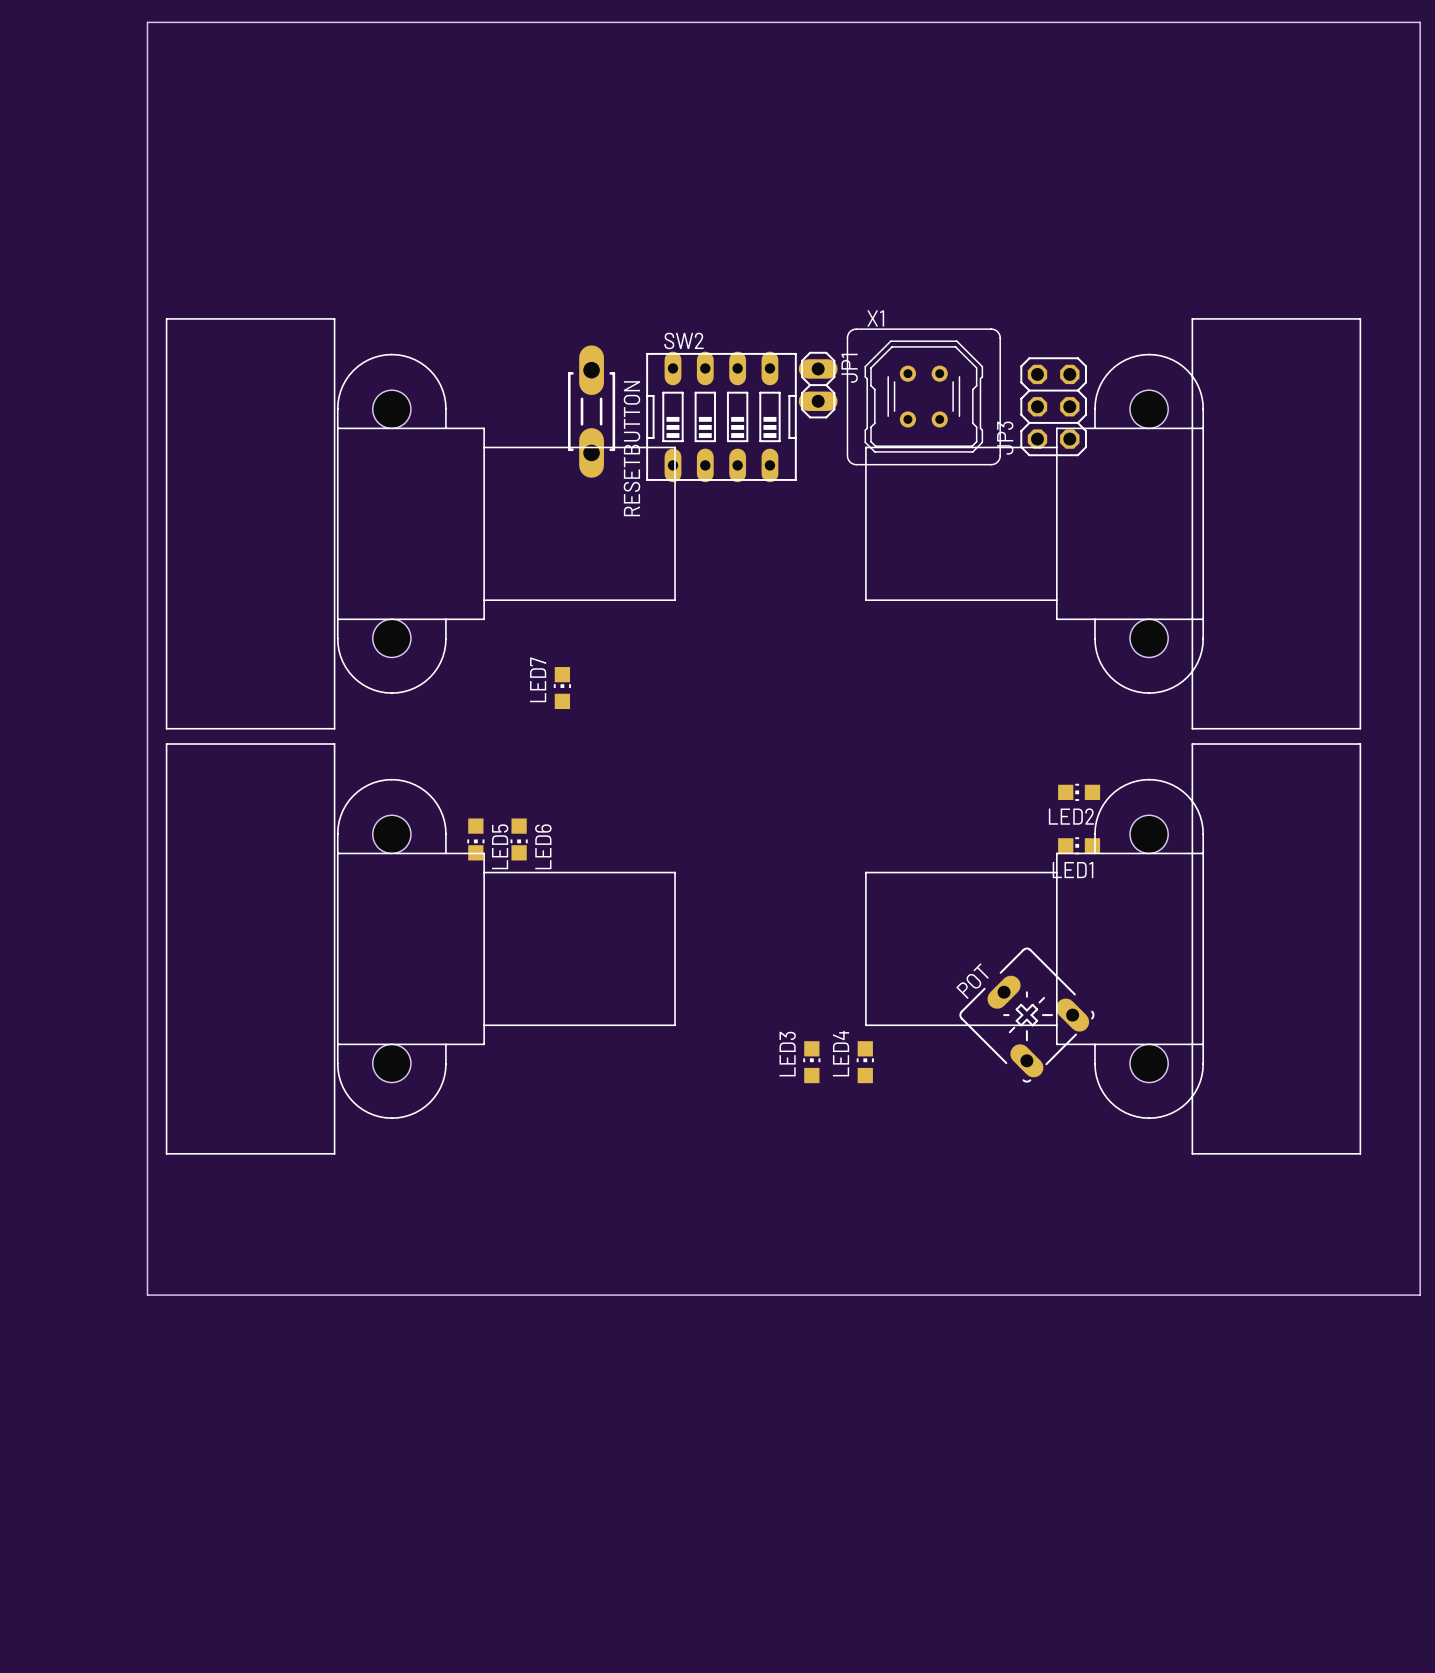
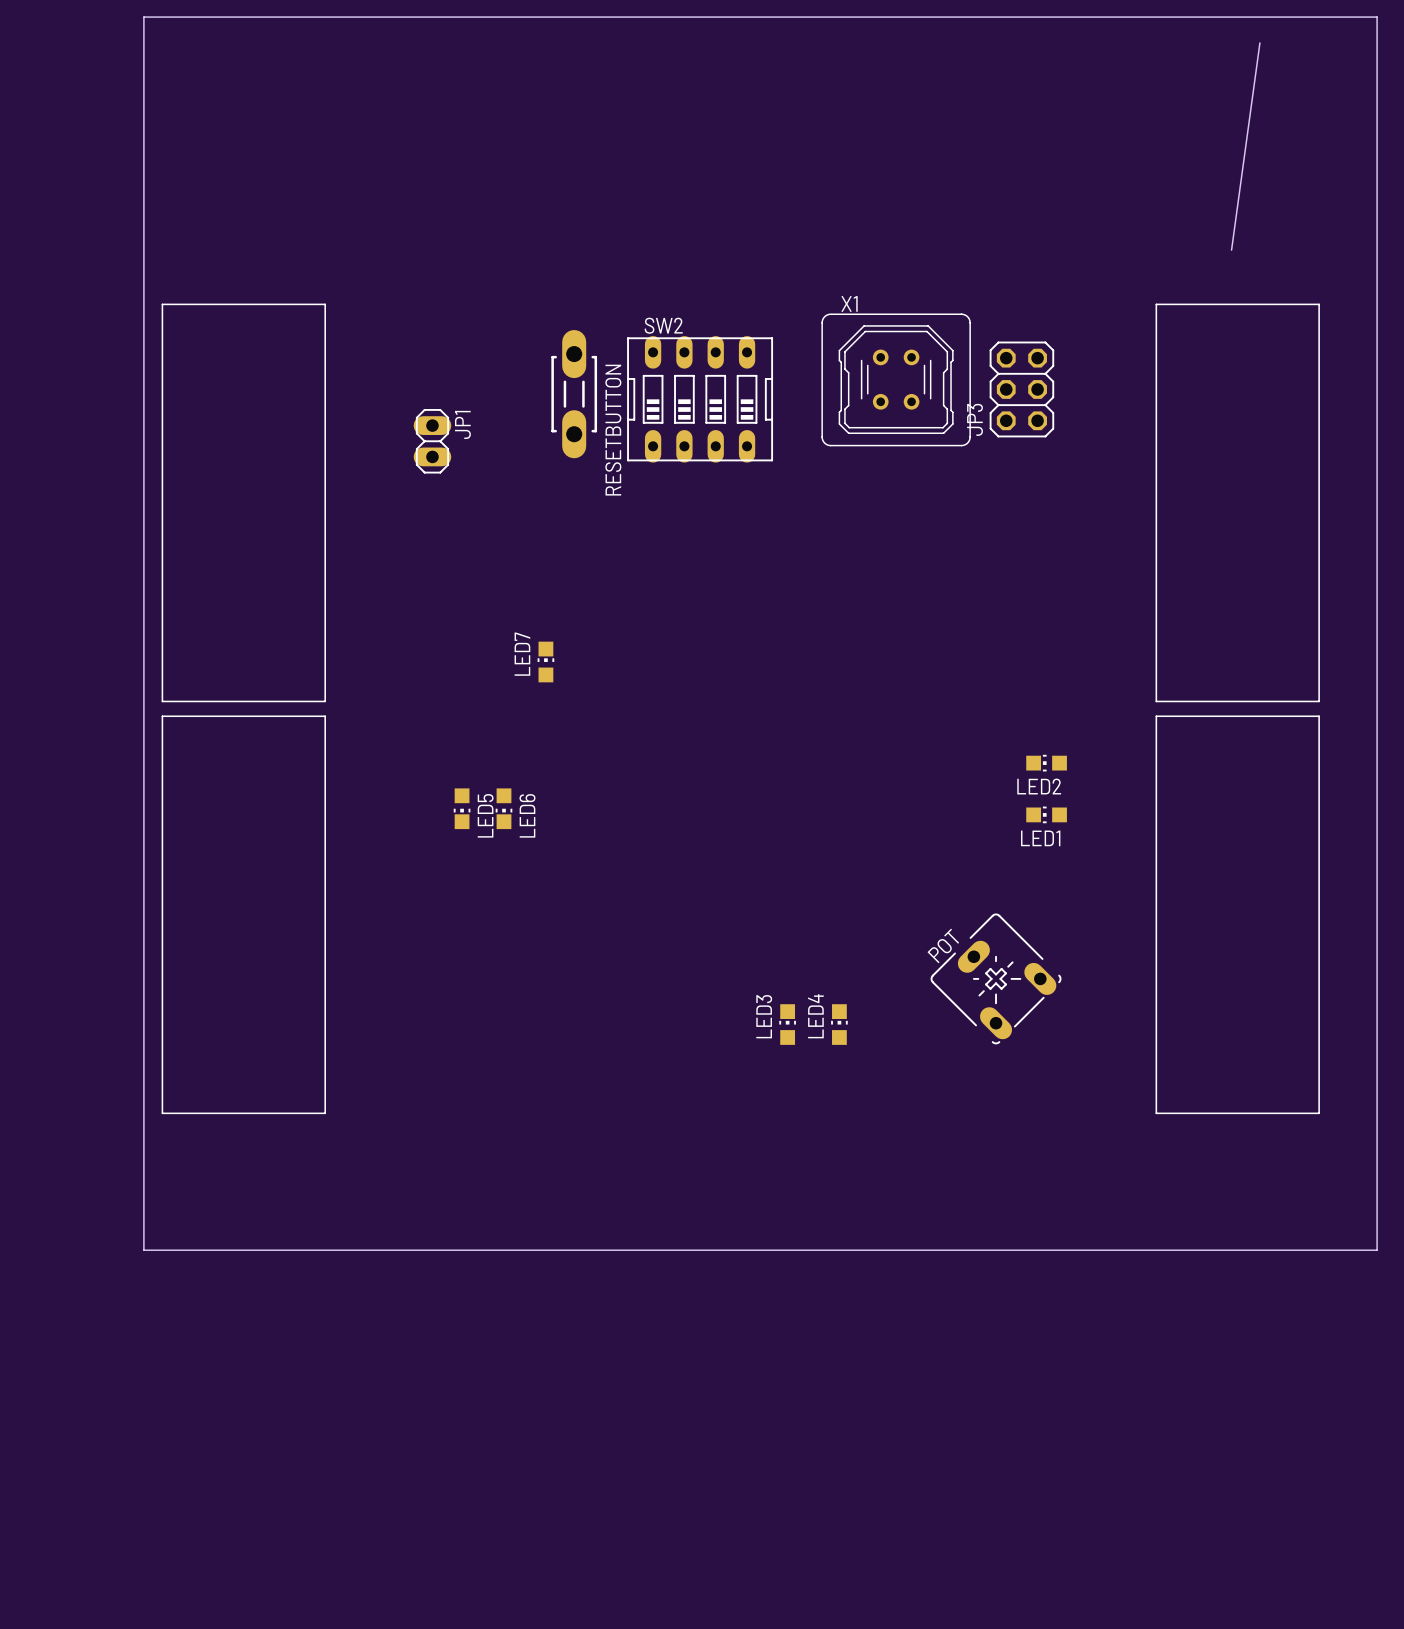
board edge: none -> (1259, 42) (1231, 250)
JP1 position: (818, 385) -> (432, 441)
part: (506, 523) -> none
part: (1034, 523) -> none
part: (506, 948) -> none
part: (1034, 948) -> none

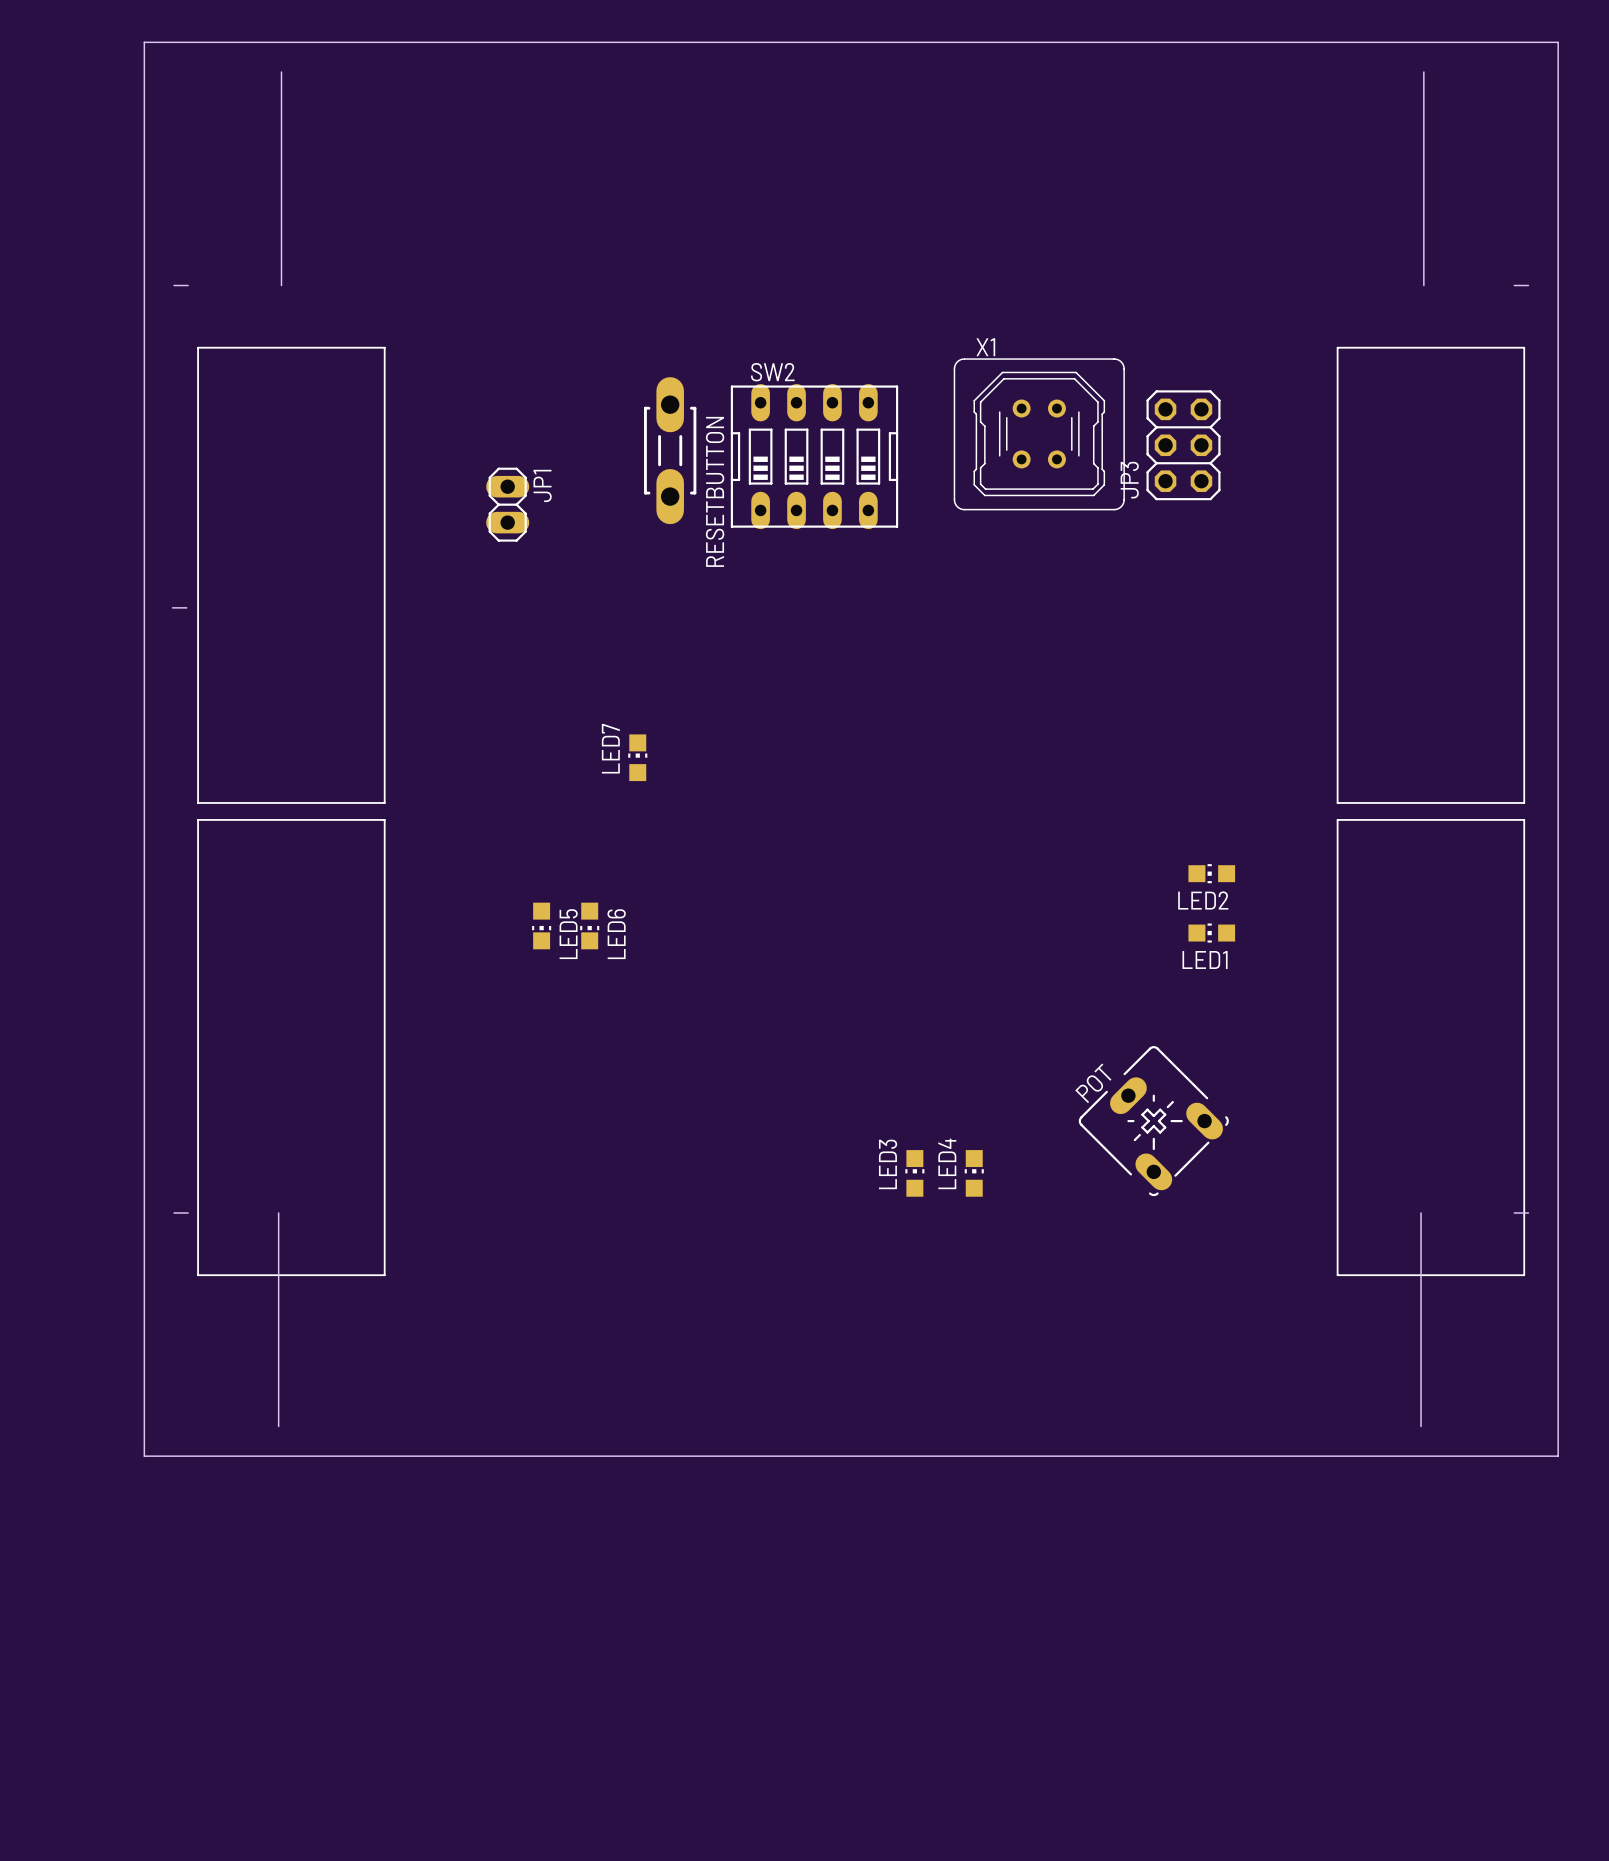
board edge: (143, 17) (143, 1250) (1377, 1250) (1377, 17) (143, 17) -> (144, 42) (144, 1456) (1558, 1456) (1558, 42) (144, 42)
board edge: (1259, 42) (1231, 250) -> (1423, 72) (1423, 285)
board edge: none -> (281, 72) (281, 285)
board edge: none -> (174, 285) (188, 285)
board edge: none -> (1514, 285) (1528, 285)
board edge: none -> (172, 607) (186, 607)
board edge: none -> (174, 1212) (188, 1212)
board edge: none -> (278, 1212) (278, 1426)
board edge: none -> (1421, 1212) (1421, 1426)
board edge: none -> (1514, 1212) (1528, 1212)

